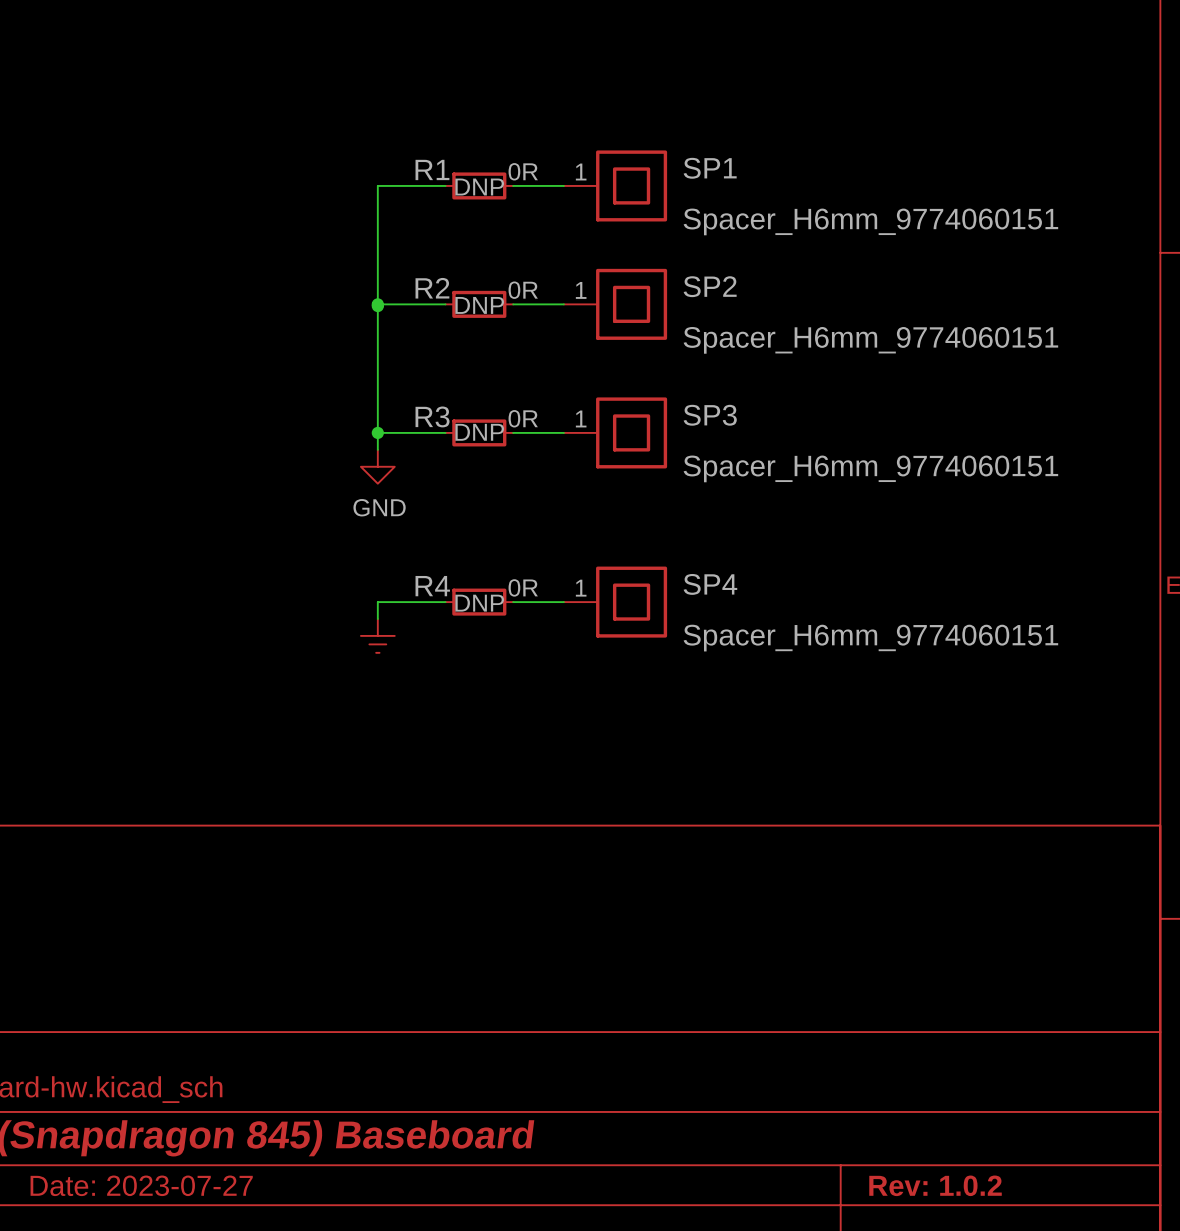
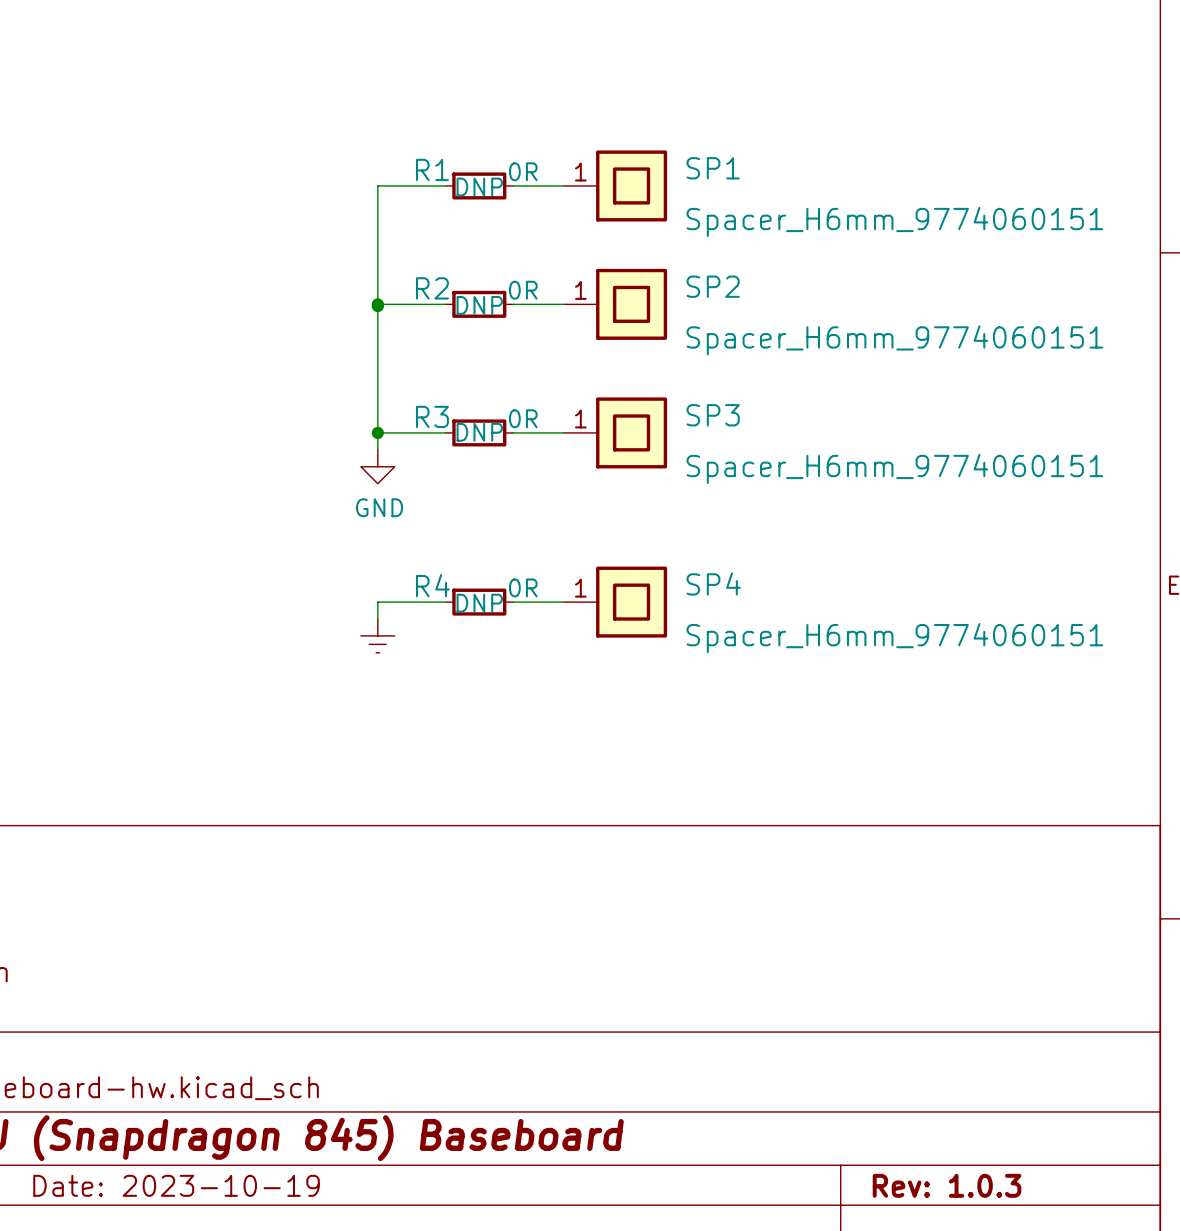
title block: Date: 2023-07-27 (141, 1185) -> Date: 2023-10-19 (176, 1185)
title block: Rev: 1.0.2 (935, 1185) -> Rev: 1.0.3 (947, 1185)

